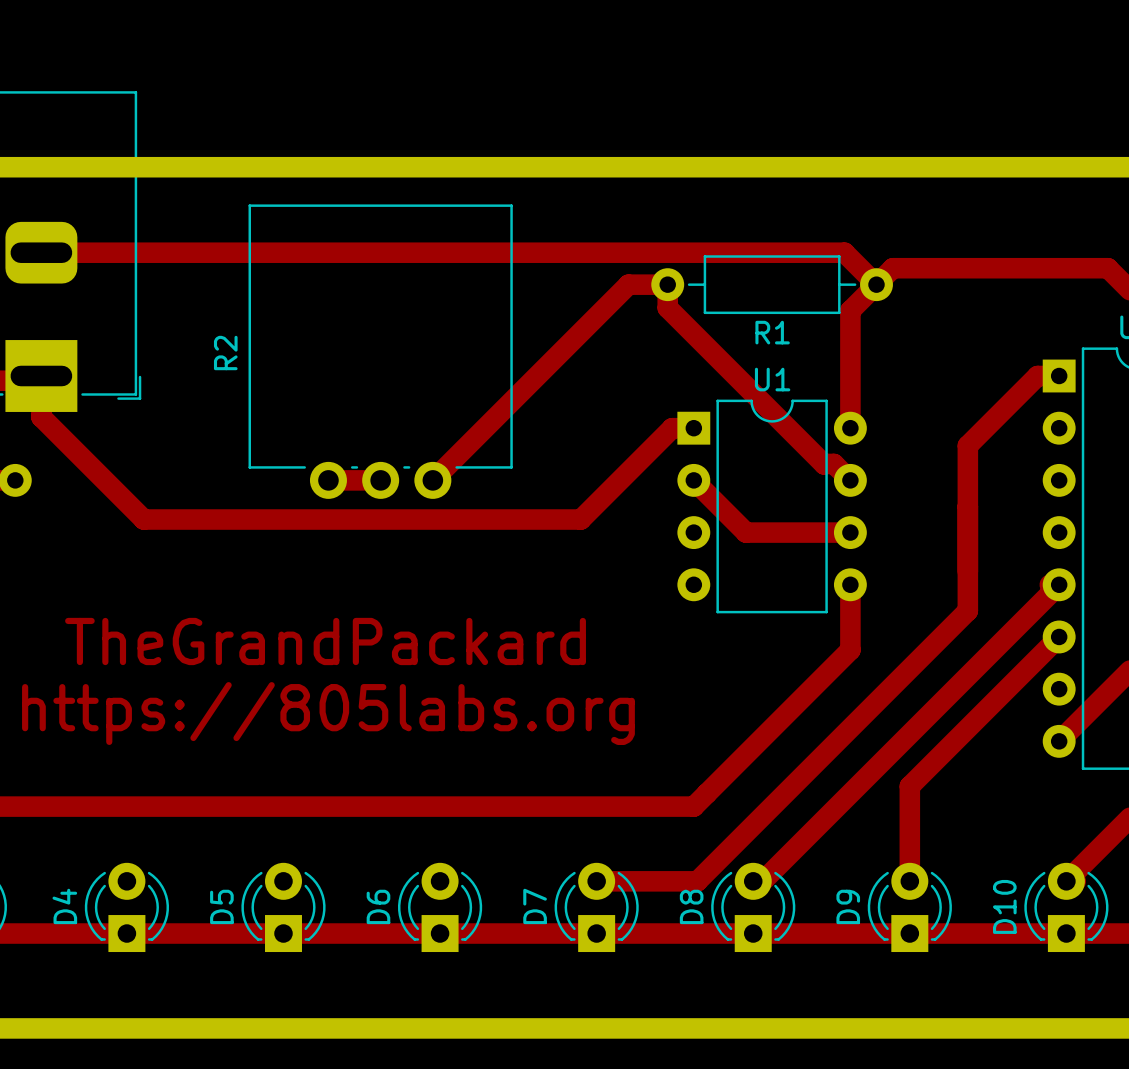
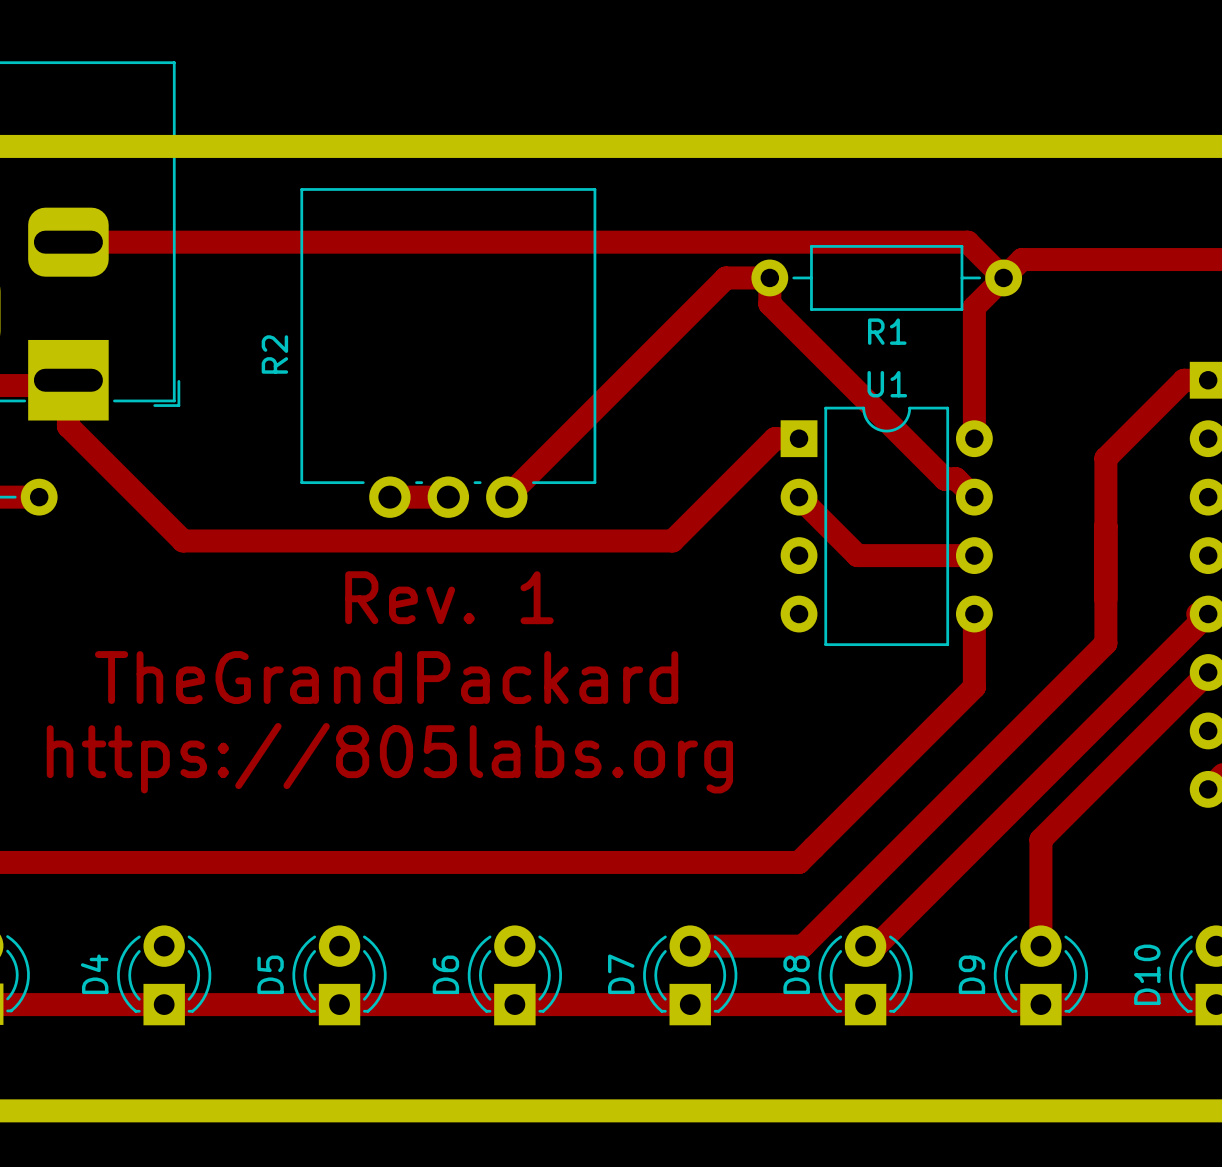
text: none -> Rev. 1 (449, 597)

